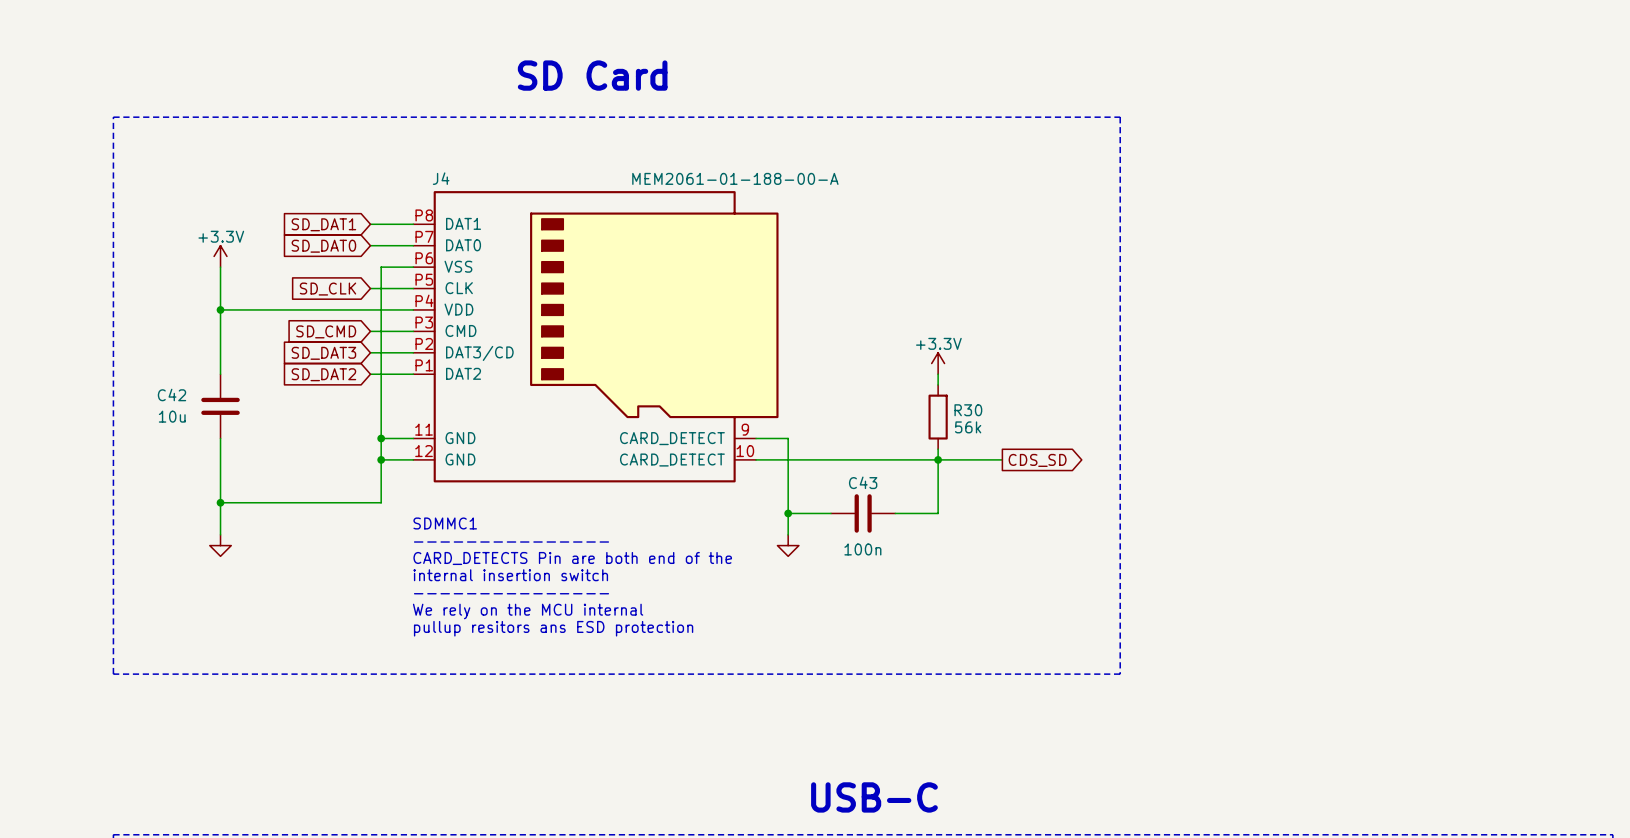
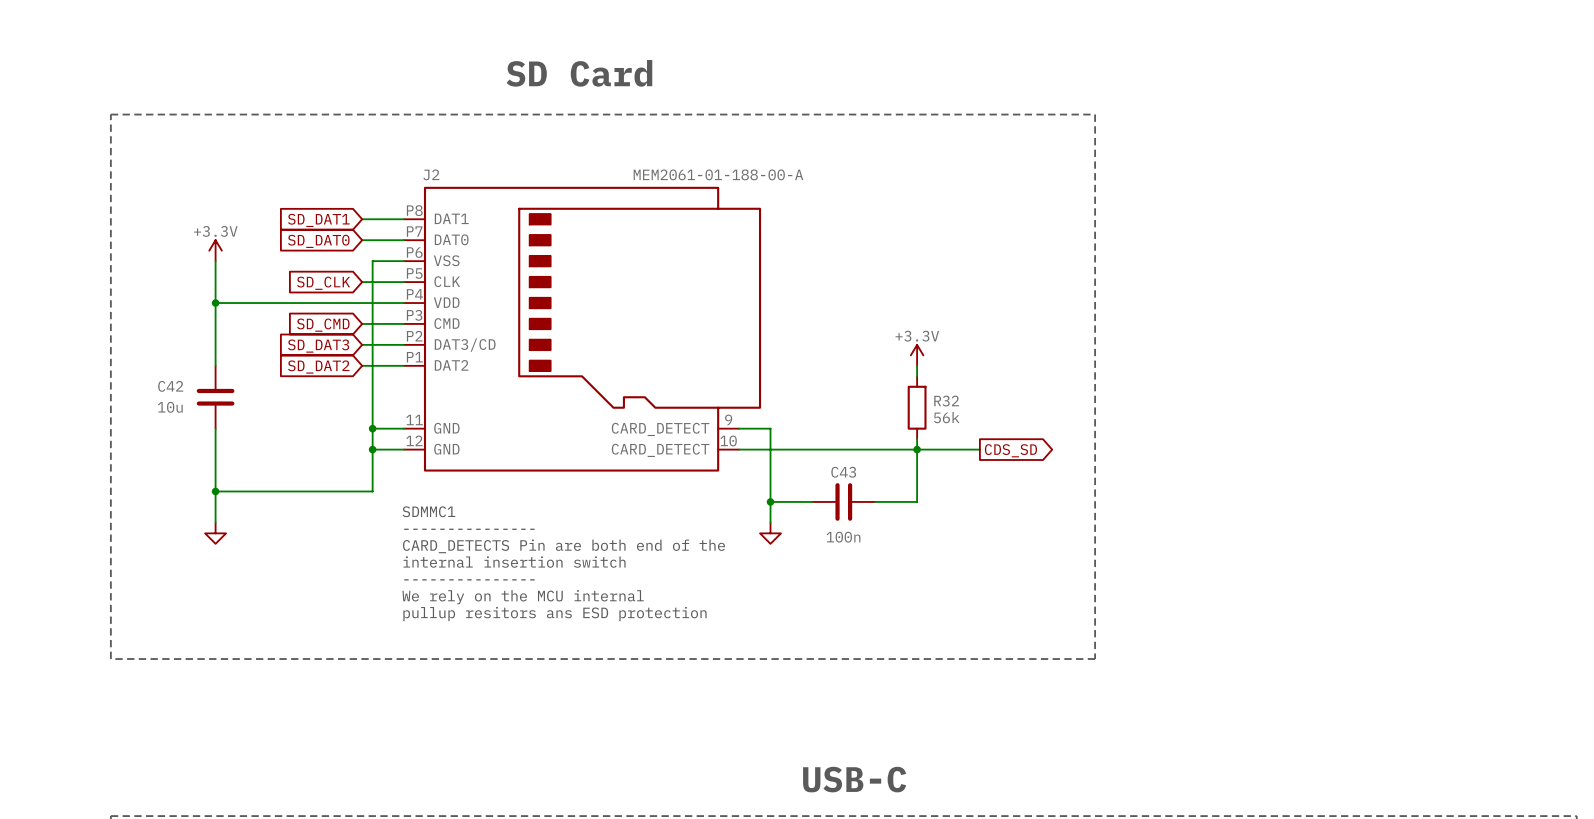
J4 name: J4 (441, 178) -> J2 (431, 174)
R30 name: R30 (968, 410) -> R32 (946, 401)

